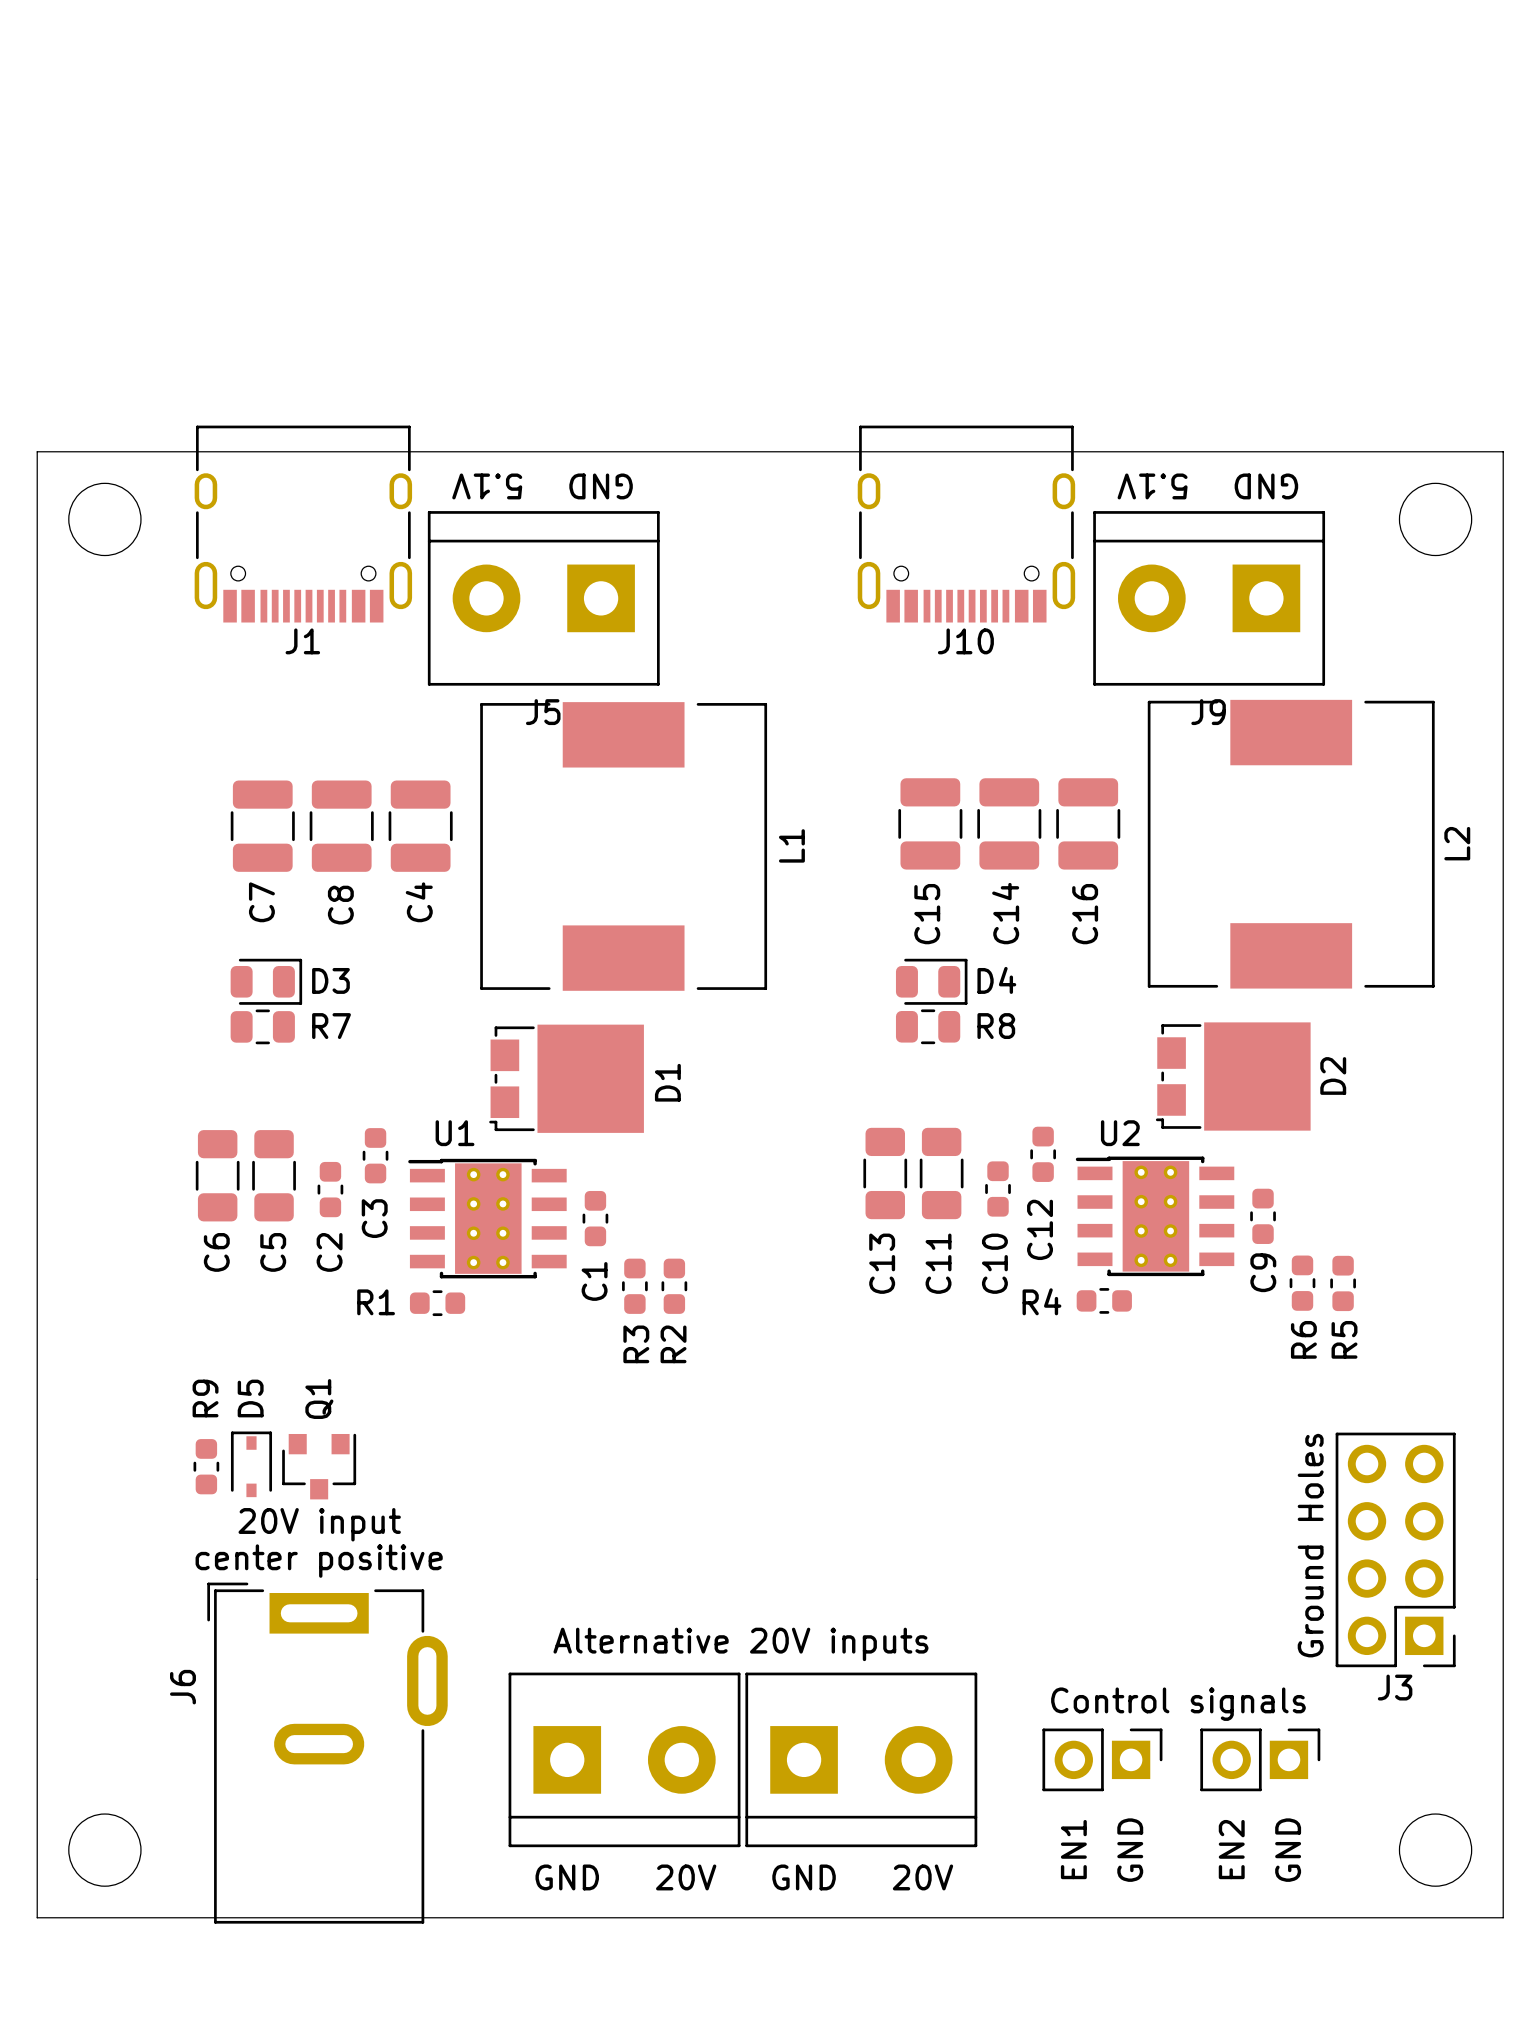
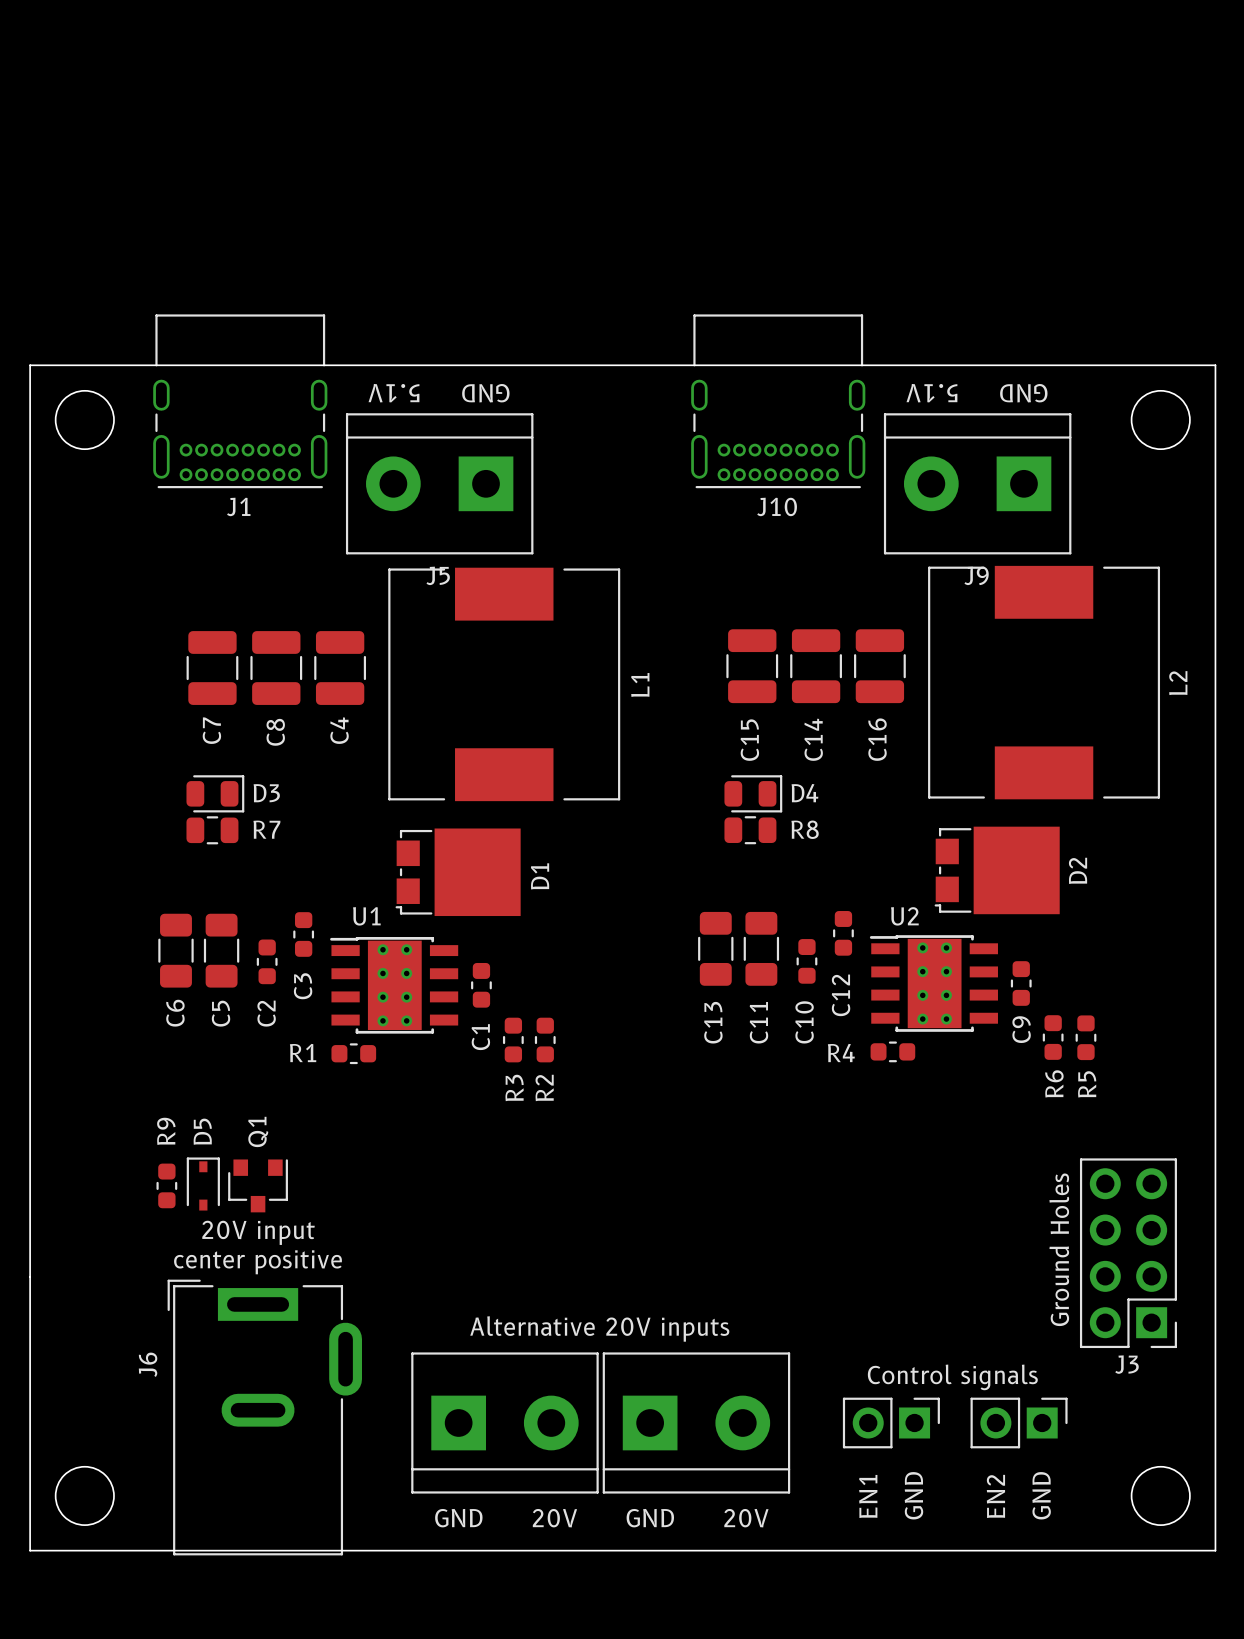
J1 footprint: [194, 425, 413, 623] -> [153, 314, 328, 489]
J10 footprint: [857, 425, 1076, 623] -> [691, 314, 866, 489]

